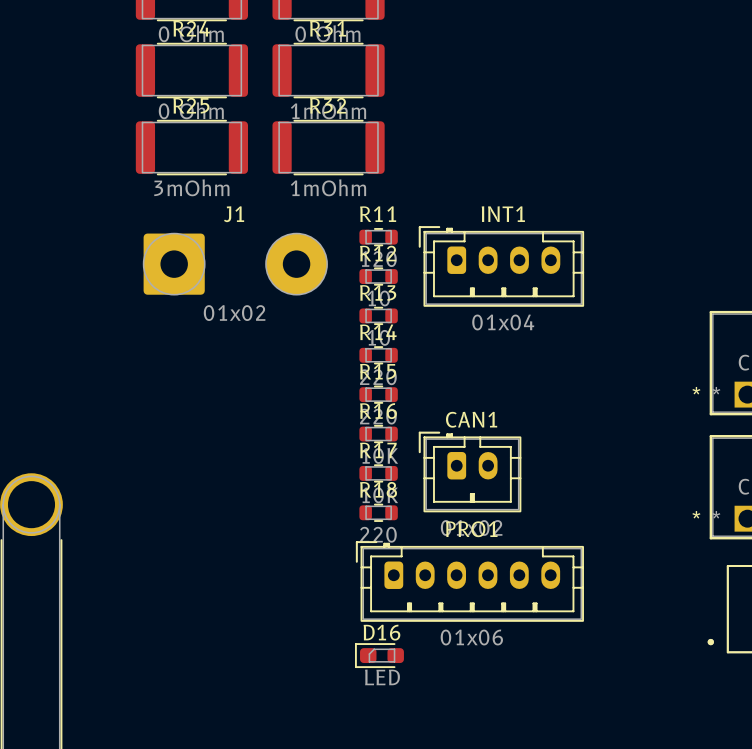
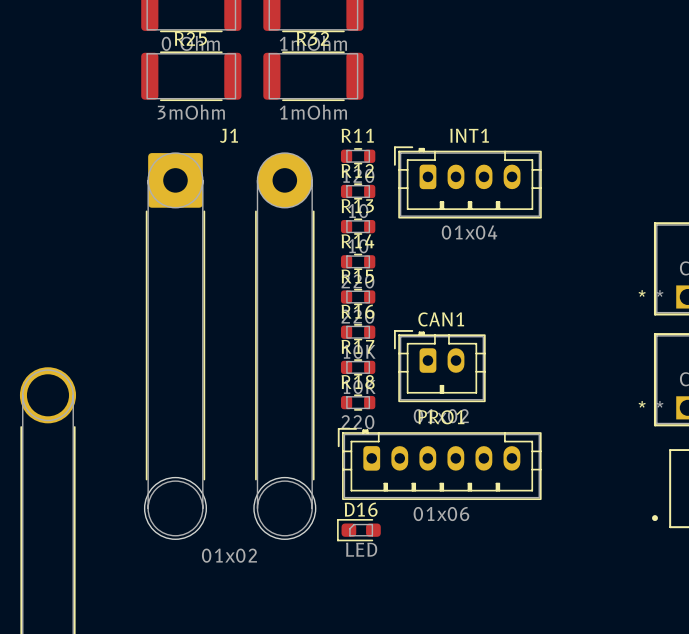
J1 footprint: [142, 232, 328, 296] -> [144, 152, 316, 540]
J1 value position: 01x02 (234, 313) -> 01x02 (229, 555)

